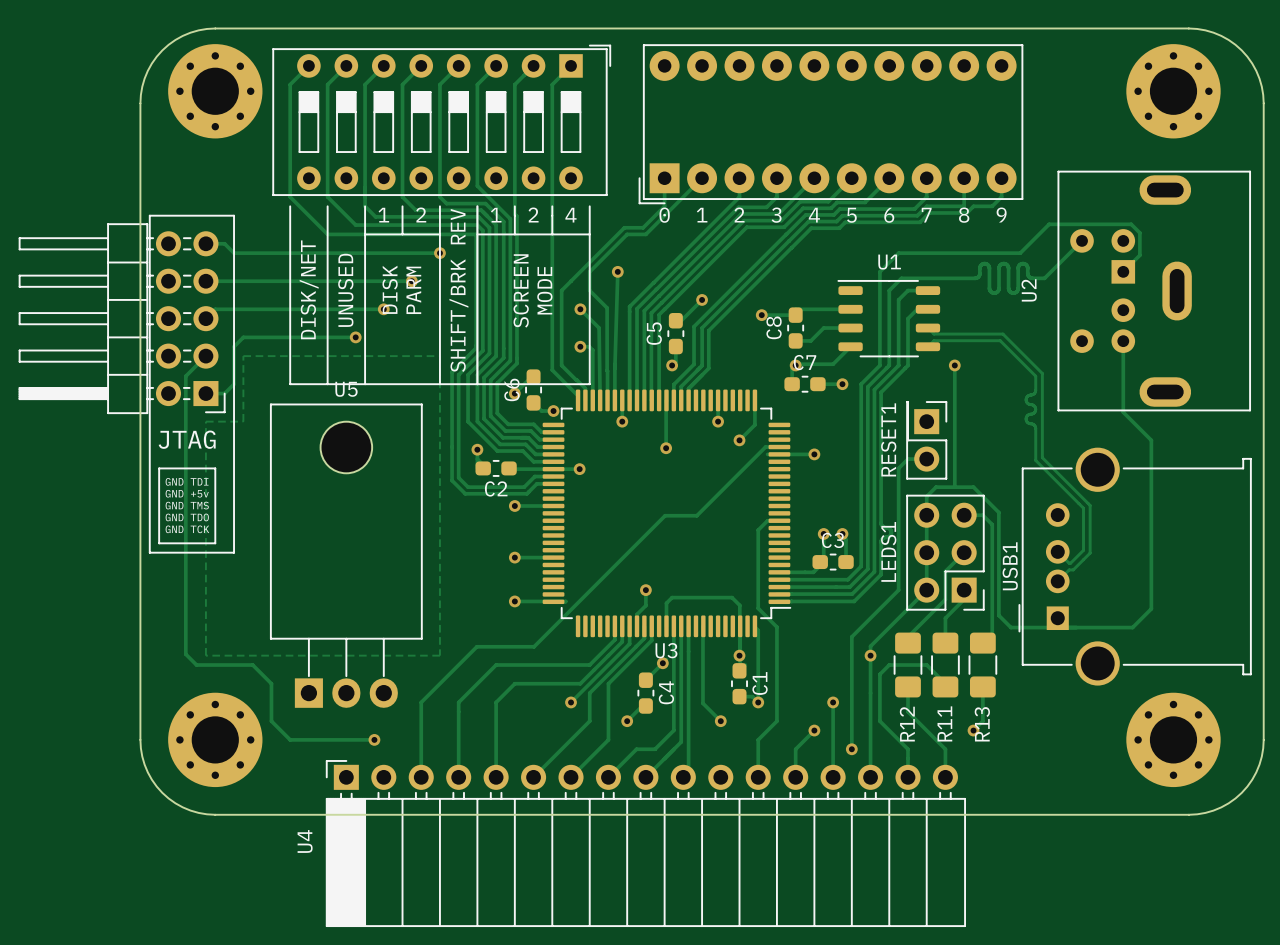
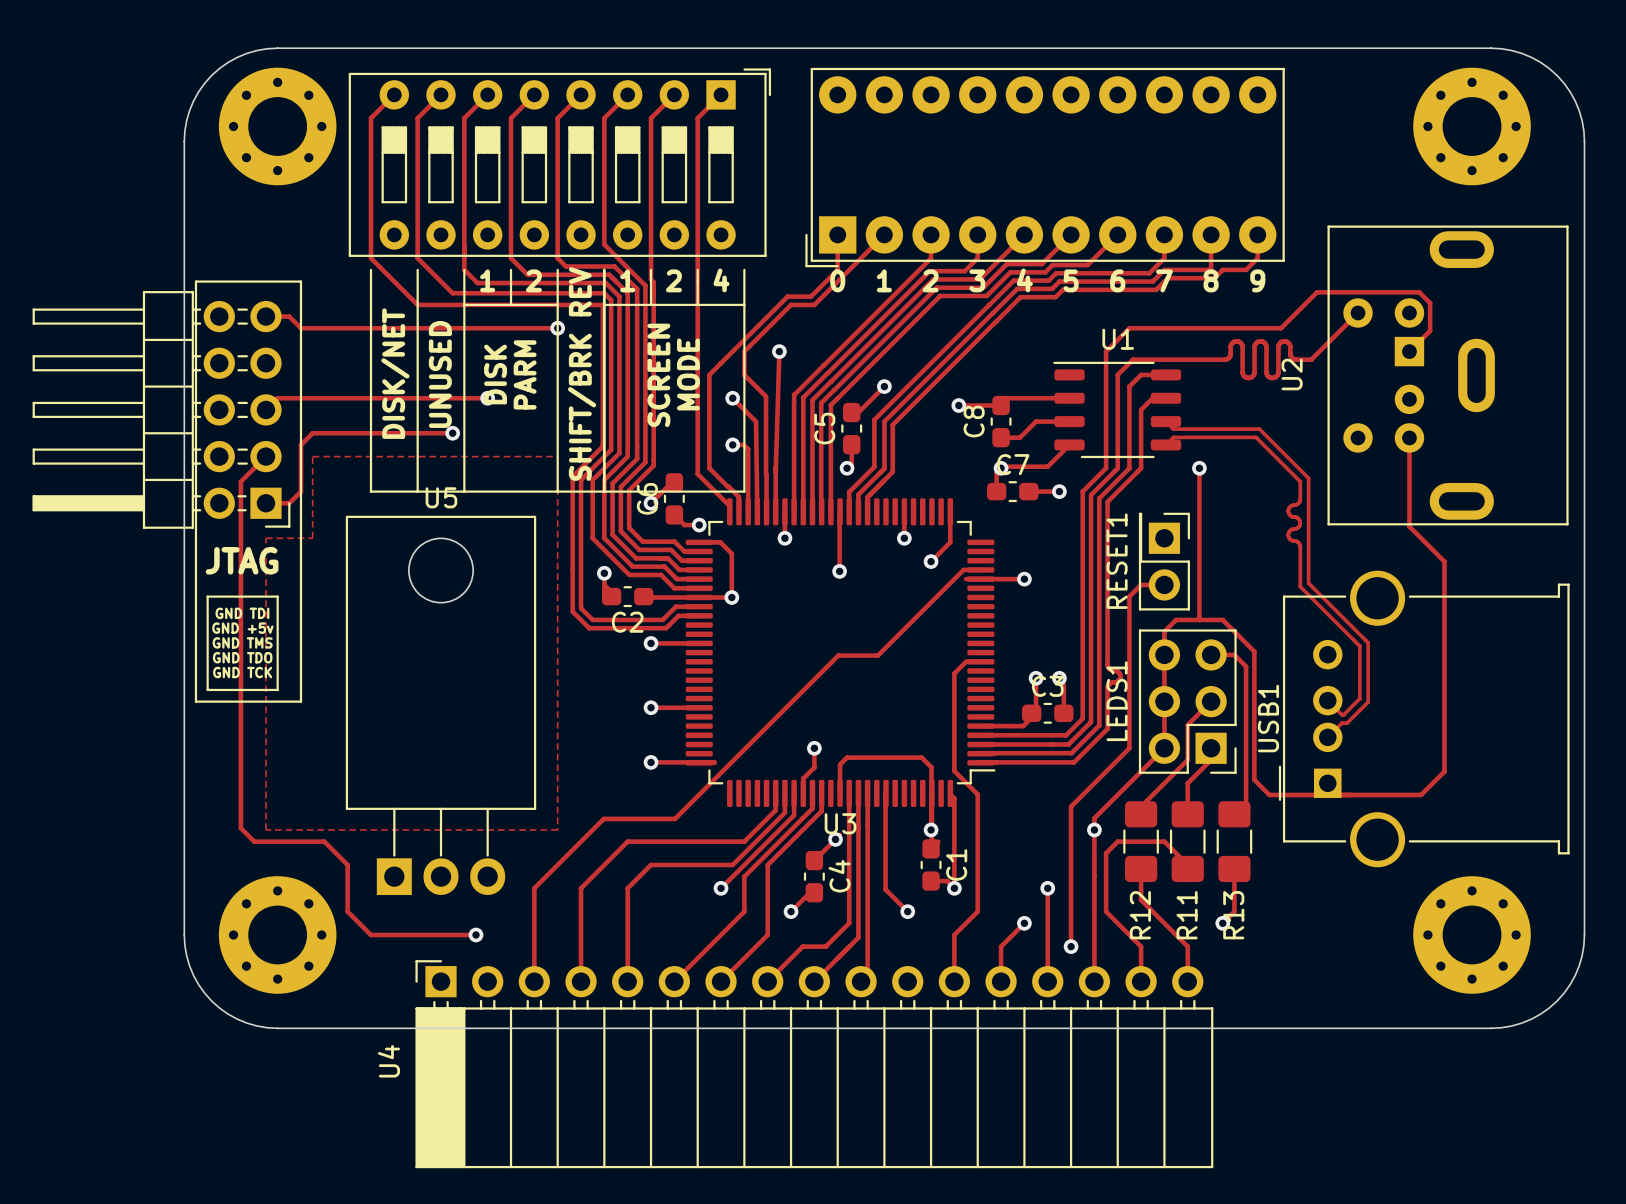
track: (215, 281) (411, 281) -> none
via: (411, 281) -> none
track: none -> (699, 542) (720, 542) (731, 553) (731, 597)

